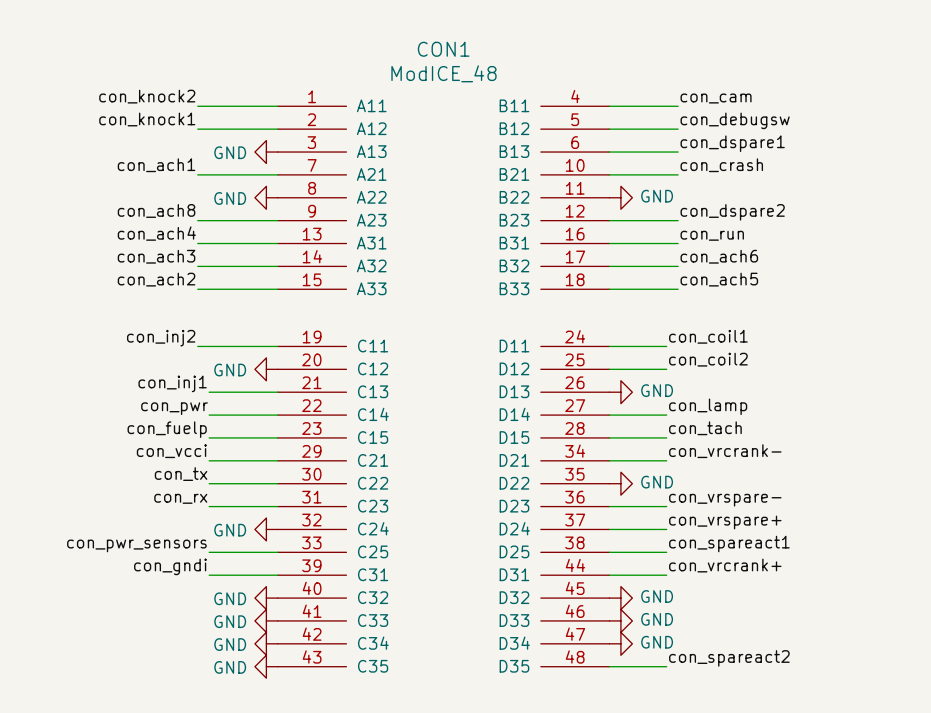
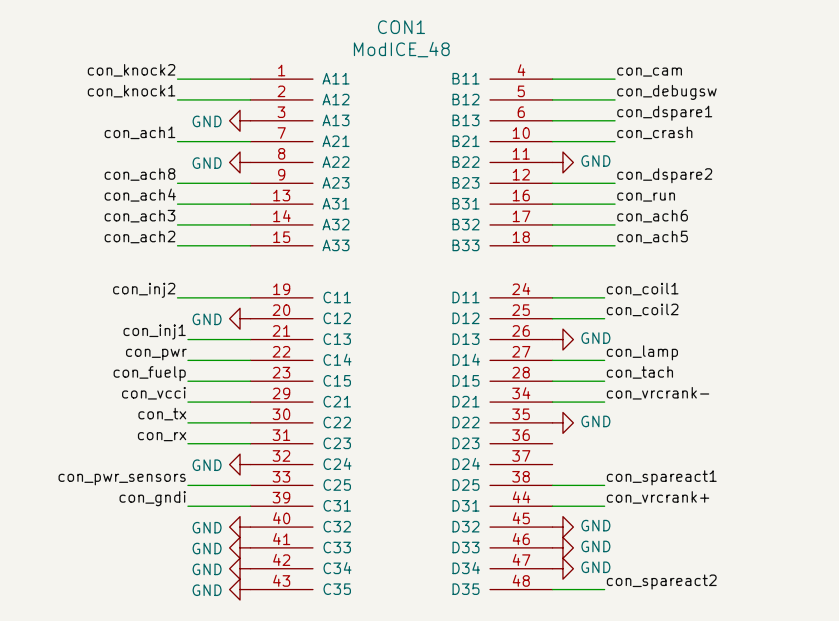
label: con_vrspare- (725, 500) -> none
wire: (609, 506) (666, 506) -> none
label: con_vrspare+ (725, 522) -> none
wire: (609, 529) (666, 529) -> none

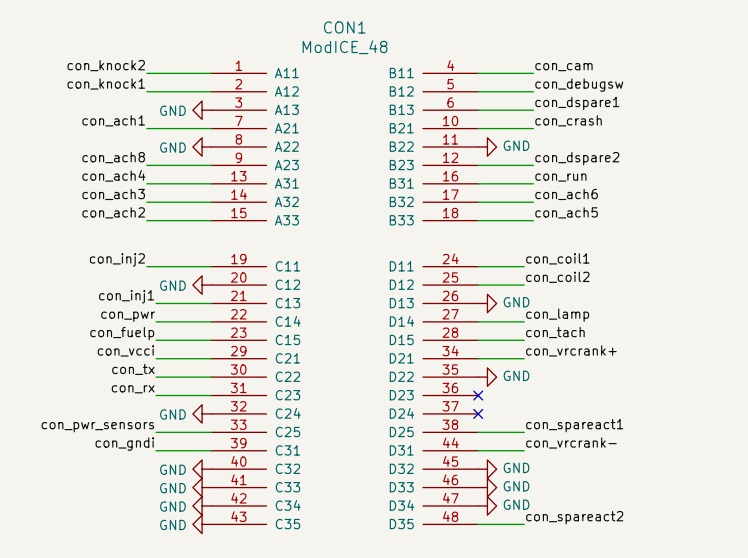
label: con_vrcrank- (658, 393) -> con_vrcrank+ (571, 350)
no-connect mark: none -> (478, 395)
no-connect mark: none -> (478, 413)
label: con_vrcrank+ (658, 497) -> con_vrcrank- (571, 442)

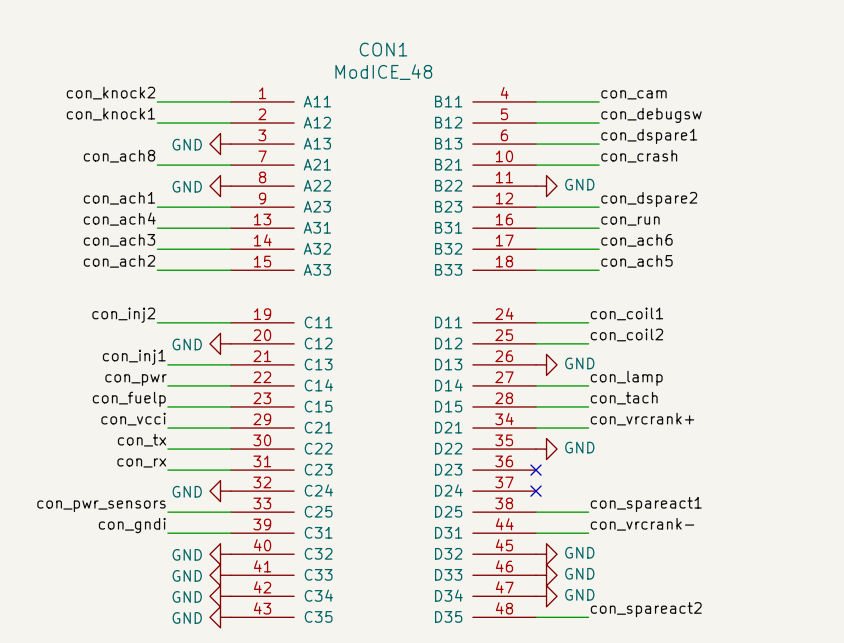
label: con_ach1 (113, 120) -> con_ach8 (119, 156)
label: con_ach8 (113, 157) -> con_ach1 (119, 198)

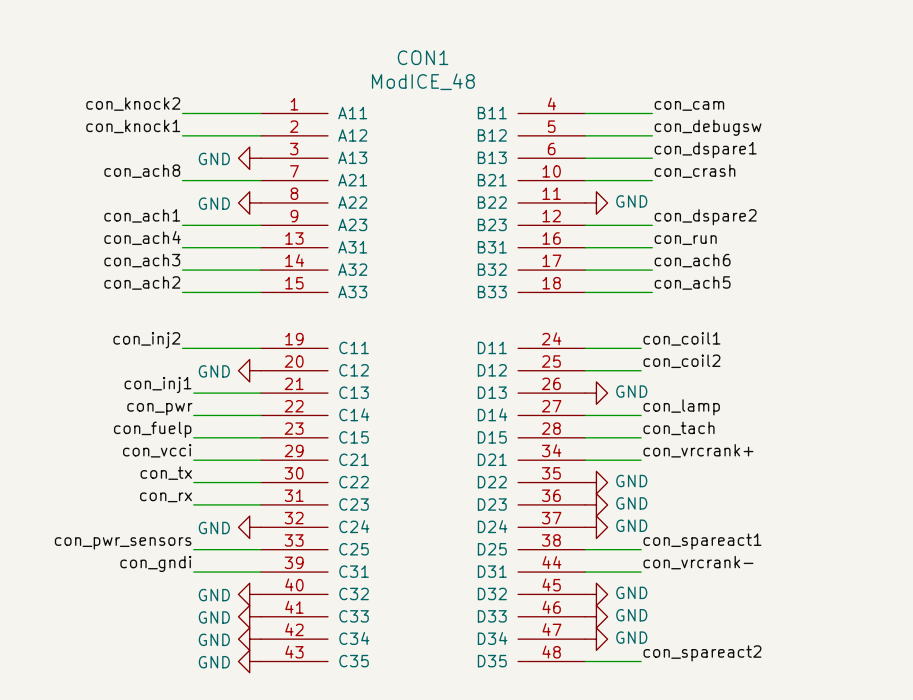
no-connect mark: (536, 470) -> none
power symbol: none -> GND (596, 504)
no-connect mark: (536, 491) -> none
power symbol: none -> GND (596, 527)

